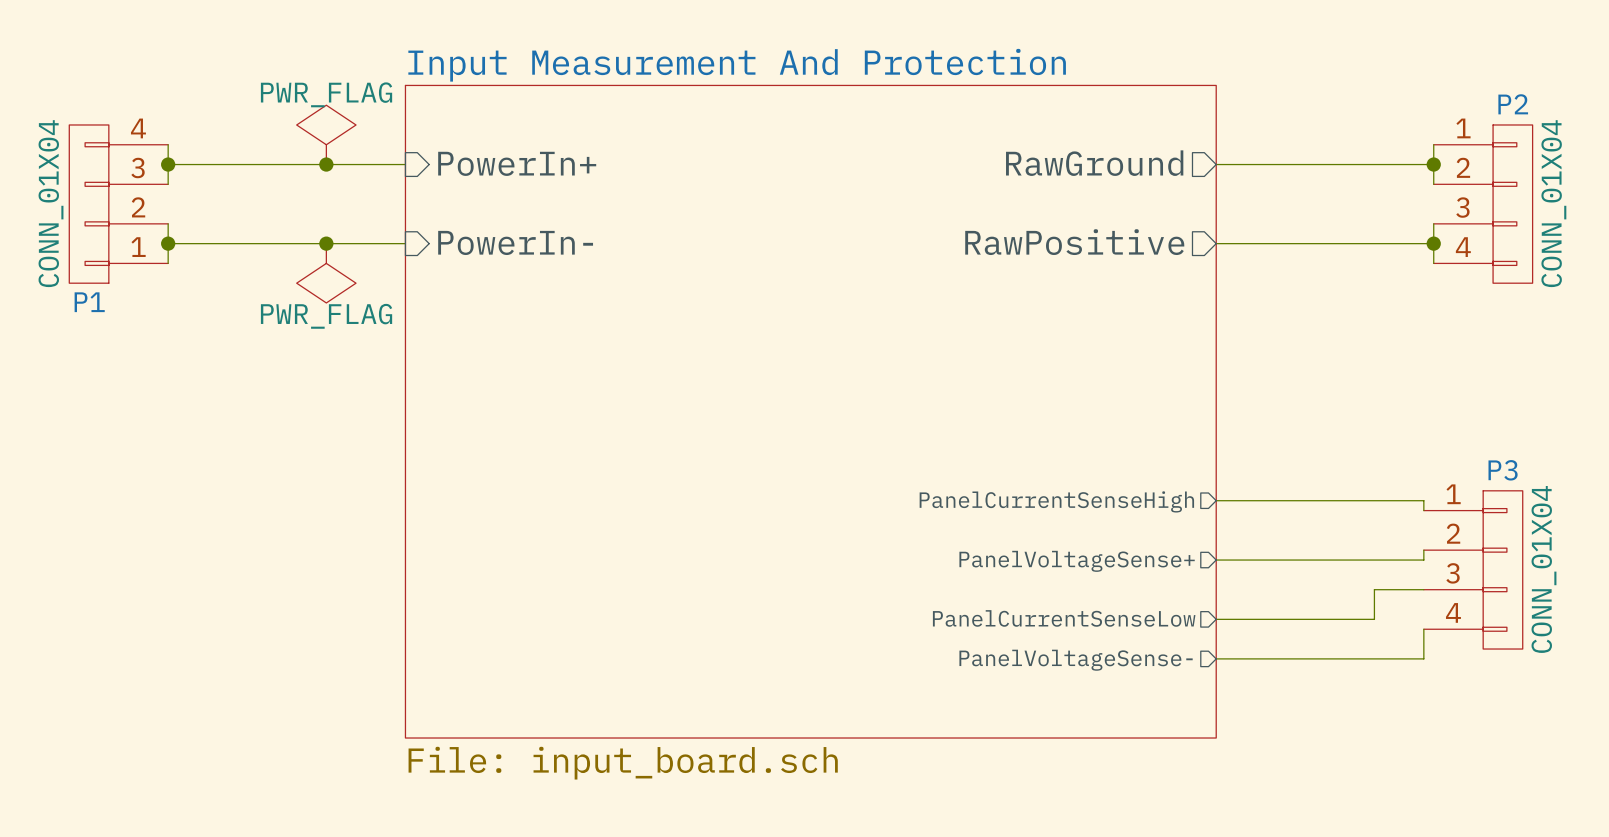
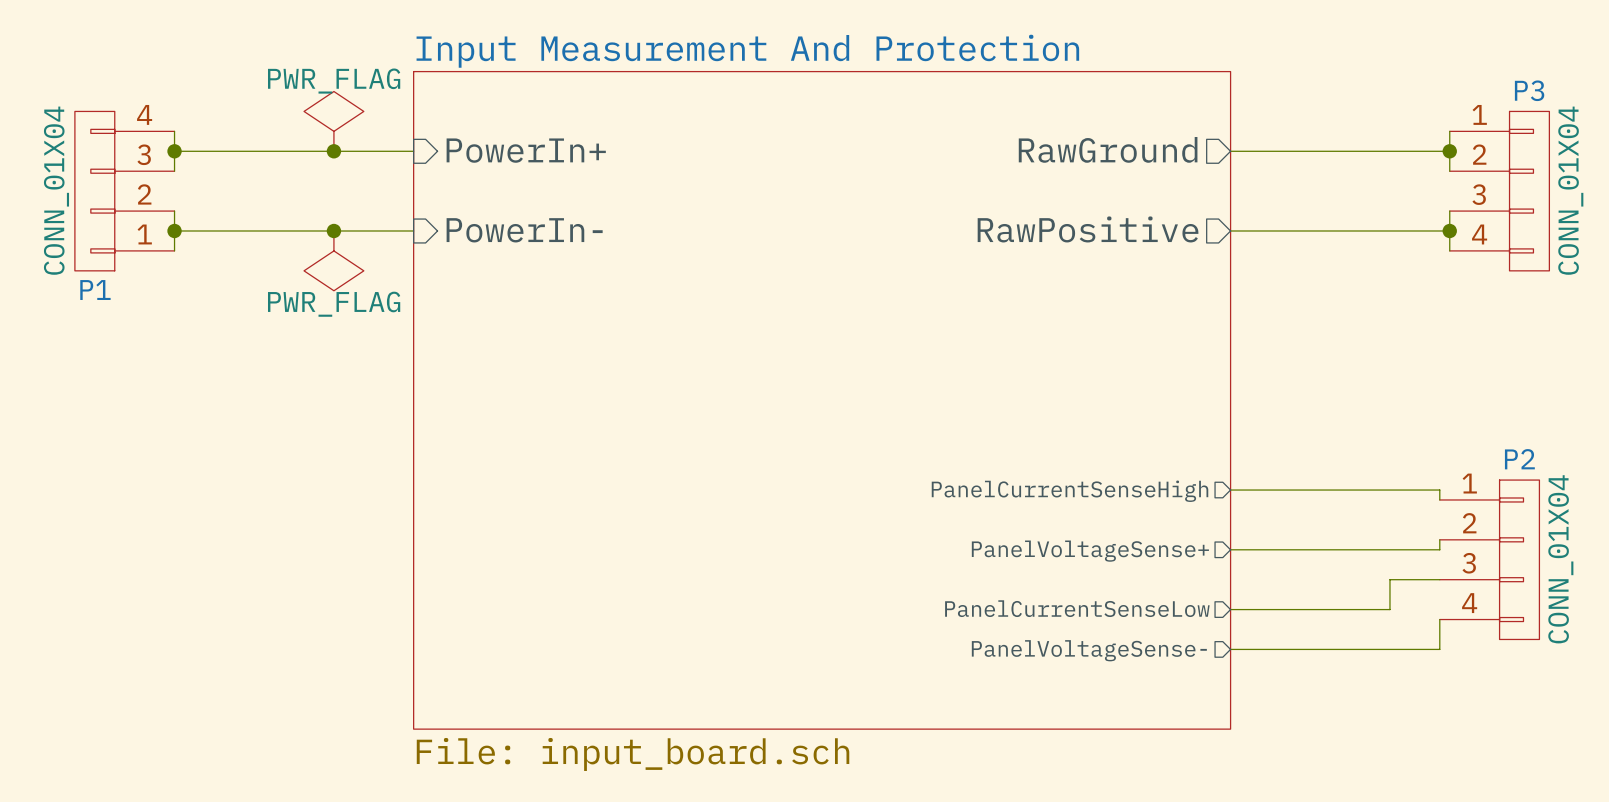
P2 name: P2 (1513, 104) -> P3 (1529, 90)
P3 name: P3 (1503, 470) -> P2 (1519, 459)

